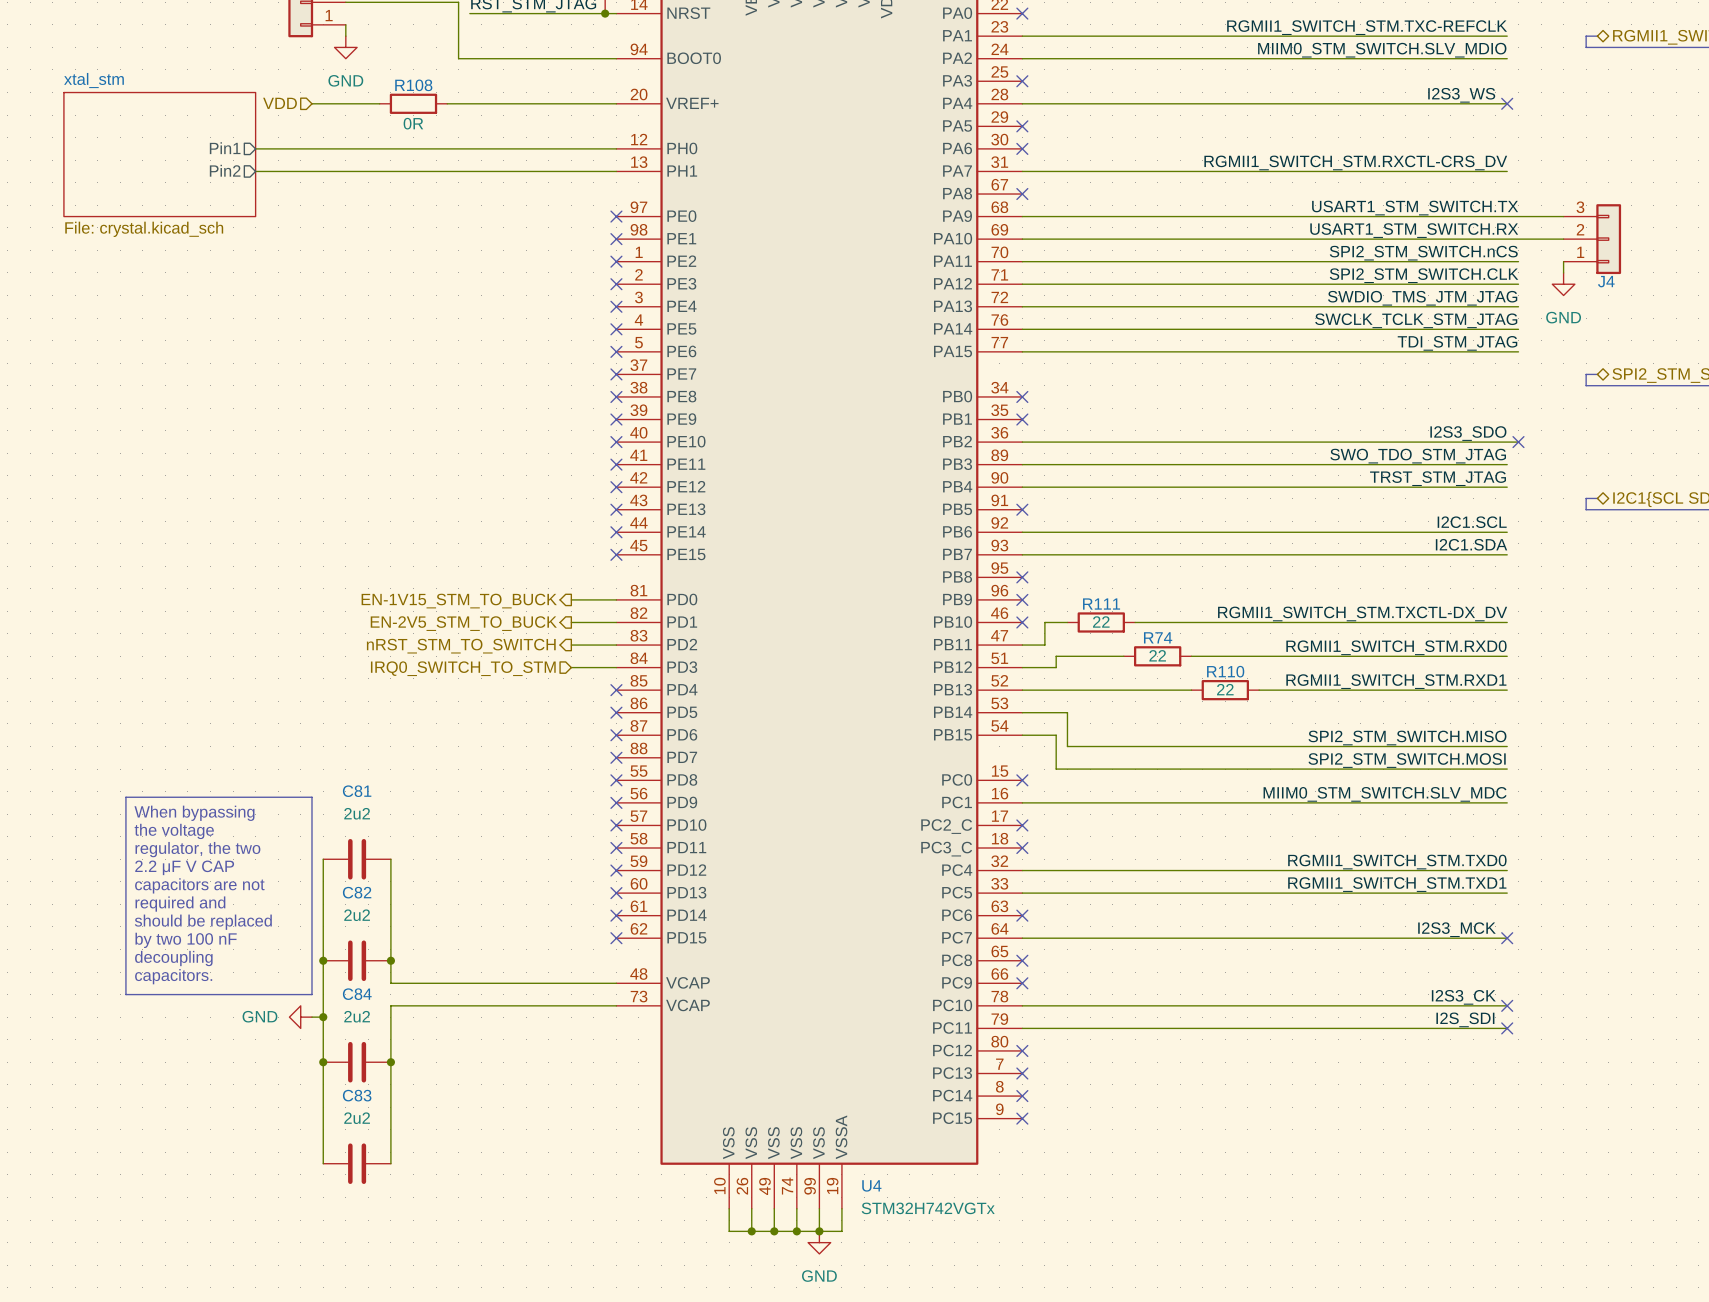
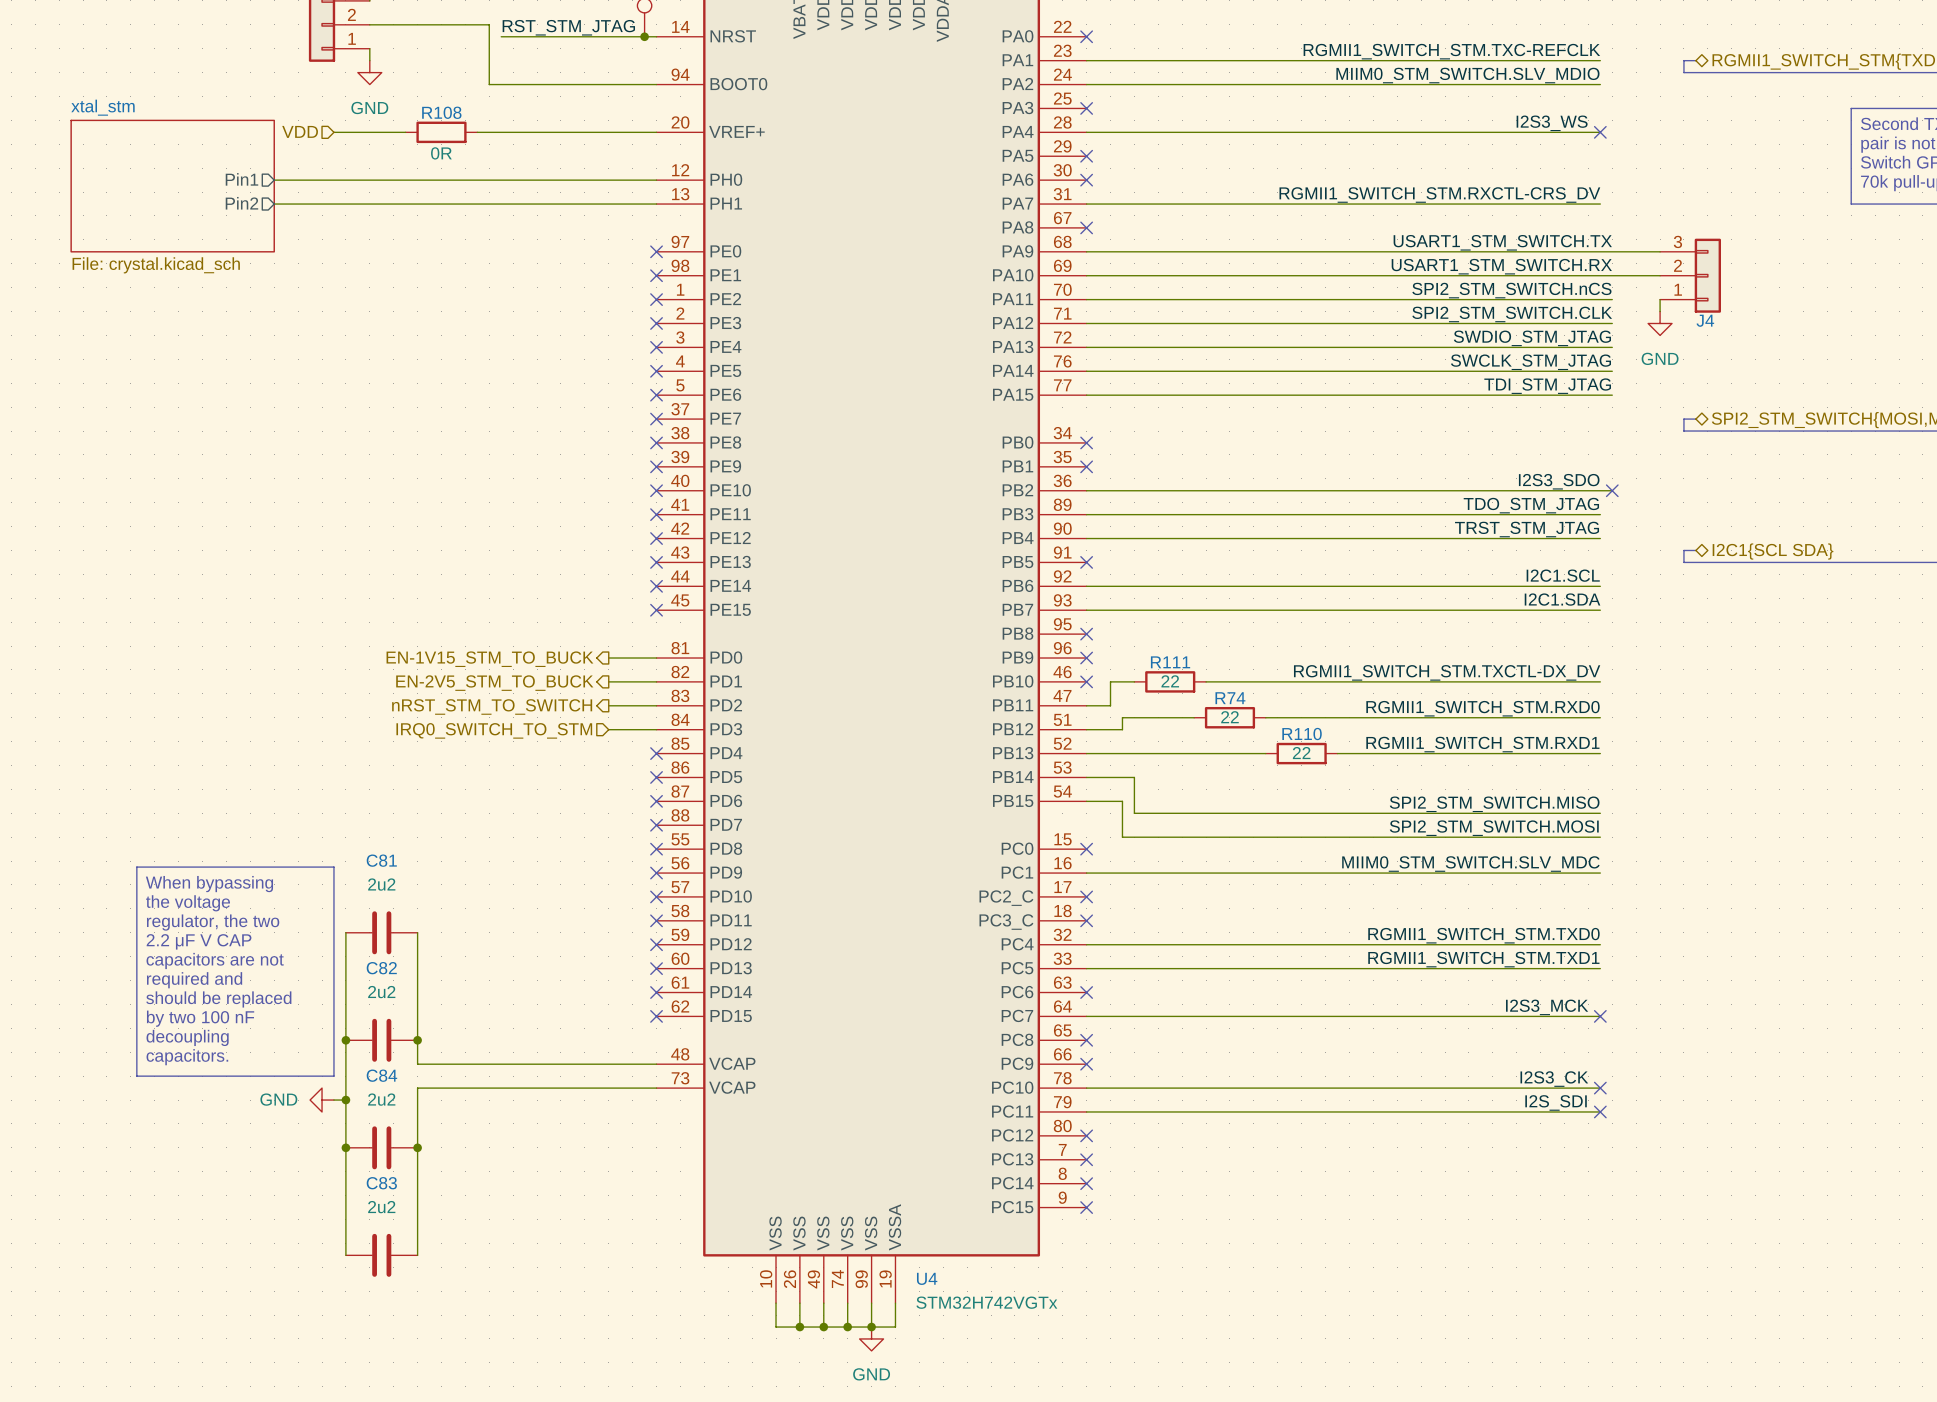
label: SWDIO_TMS_JTM_JTAG (1422, 298) -> SWDIO_STM_JTAG (1532, 338)
label: SWCLK_TCLK_STM_JTAG (1416, 320) -> SWCLK_STM_JTAG (1530, 362)
label: SWO_TDO_STM_JTAG (1418, 456) -> TDO_STM_JTAG (1531, 505)

